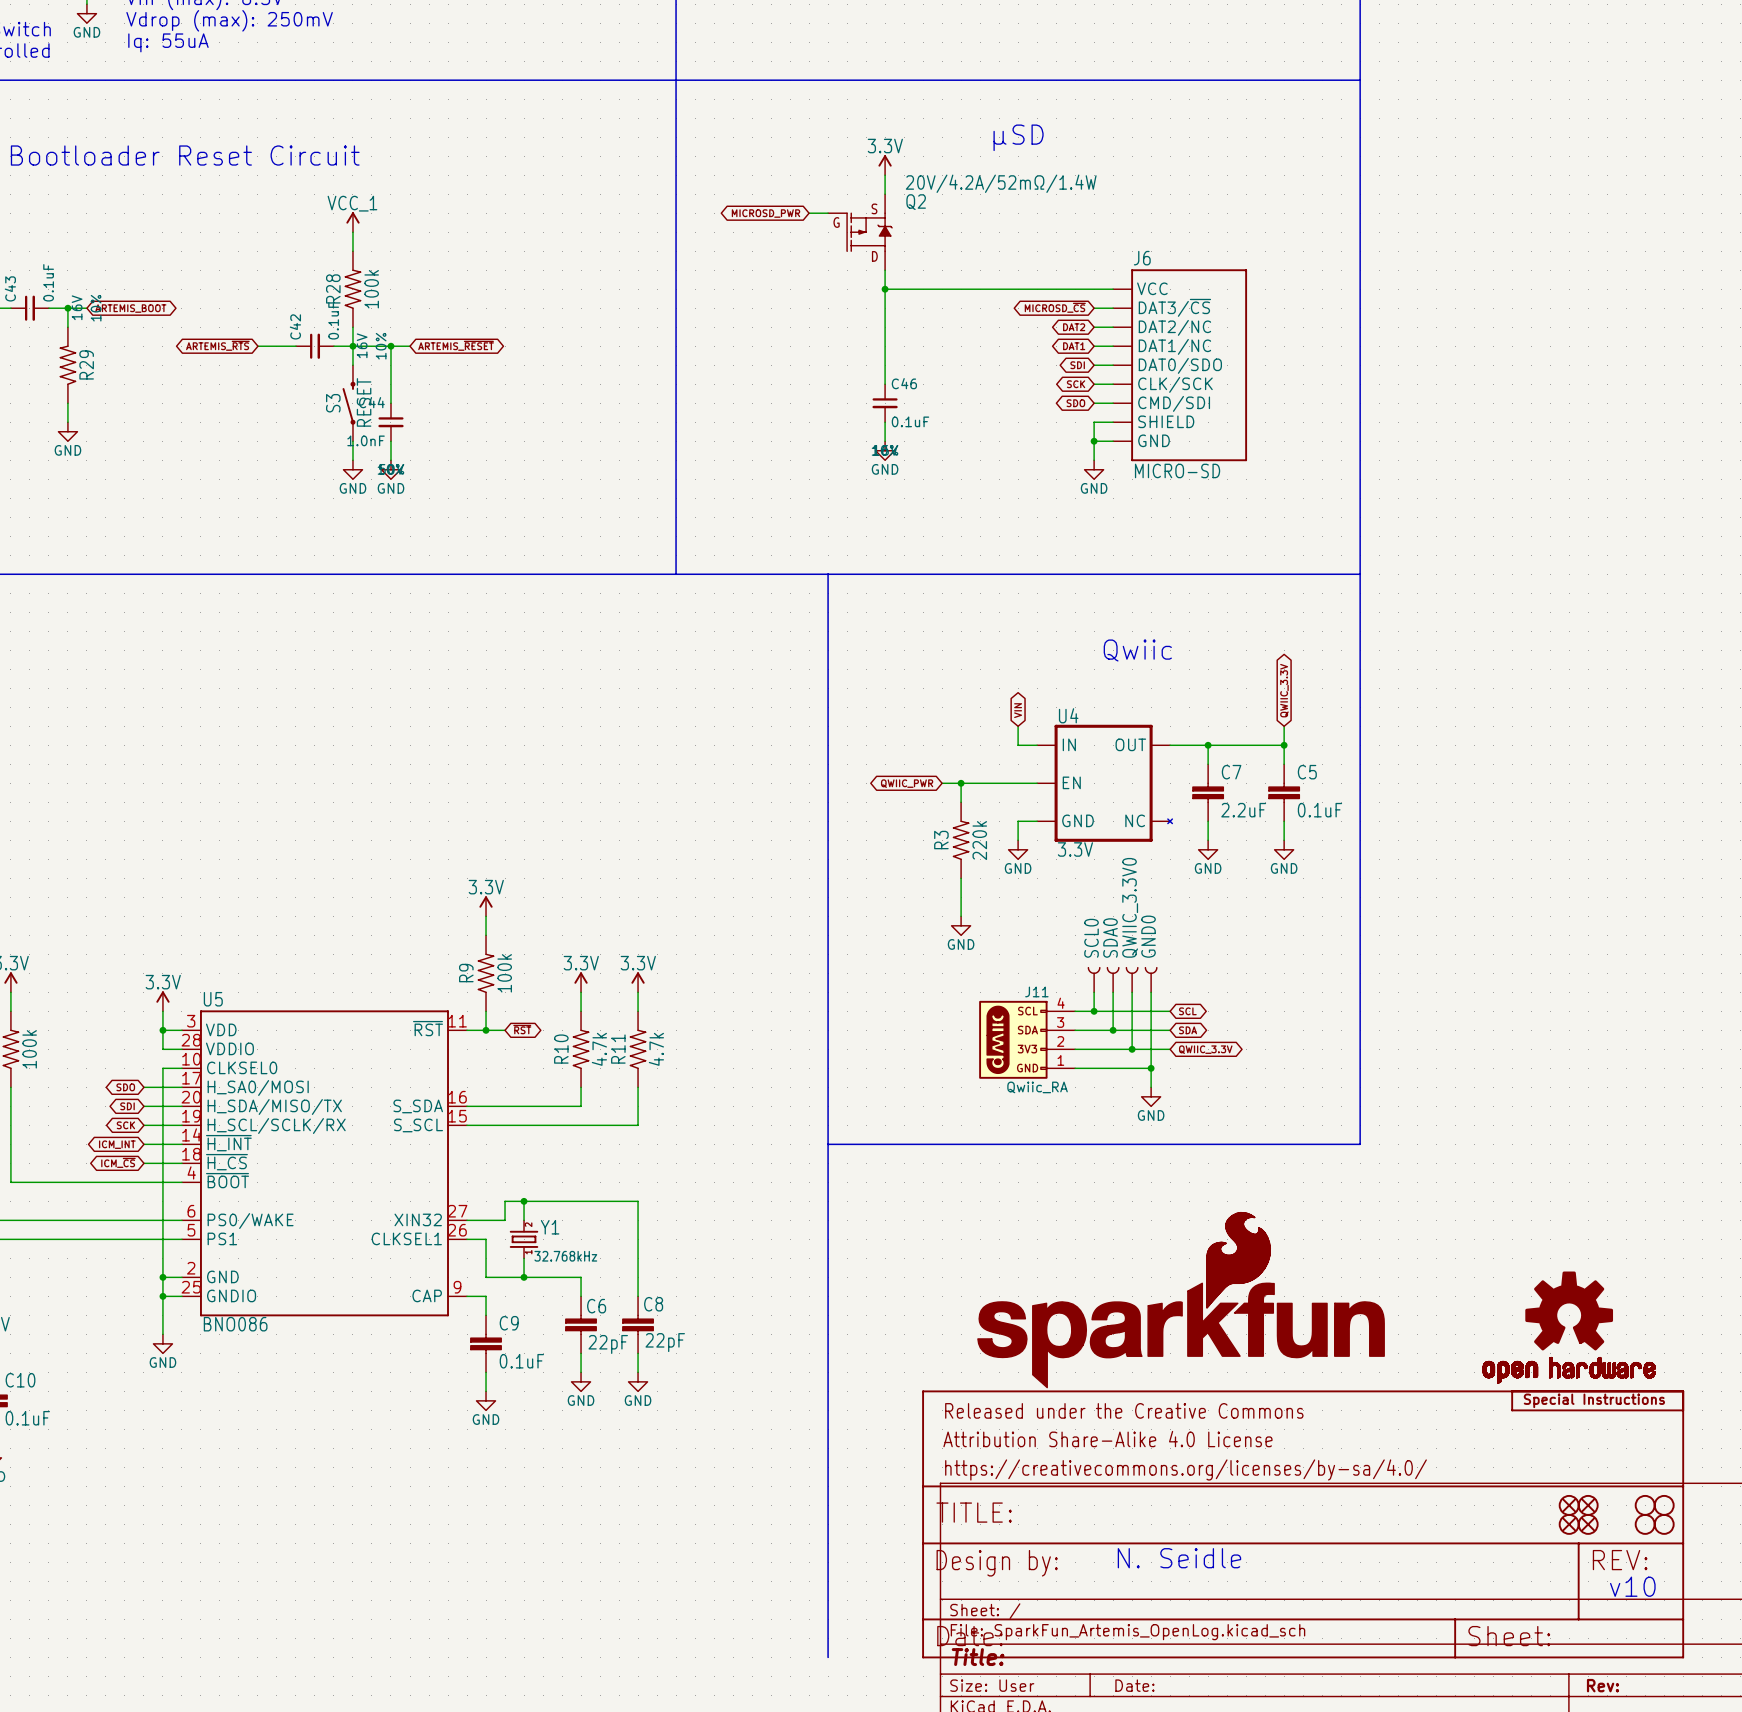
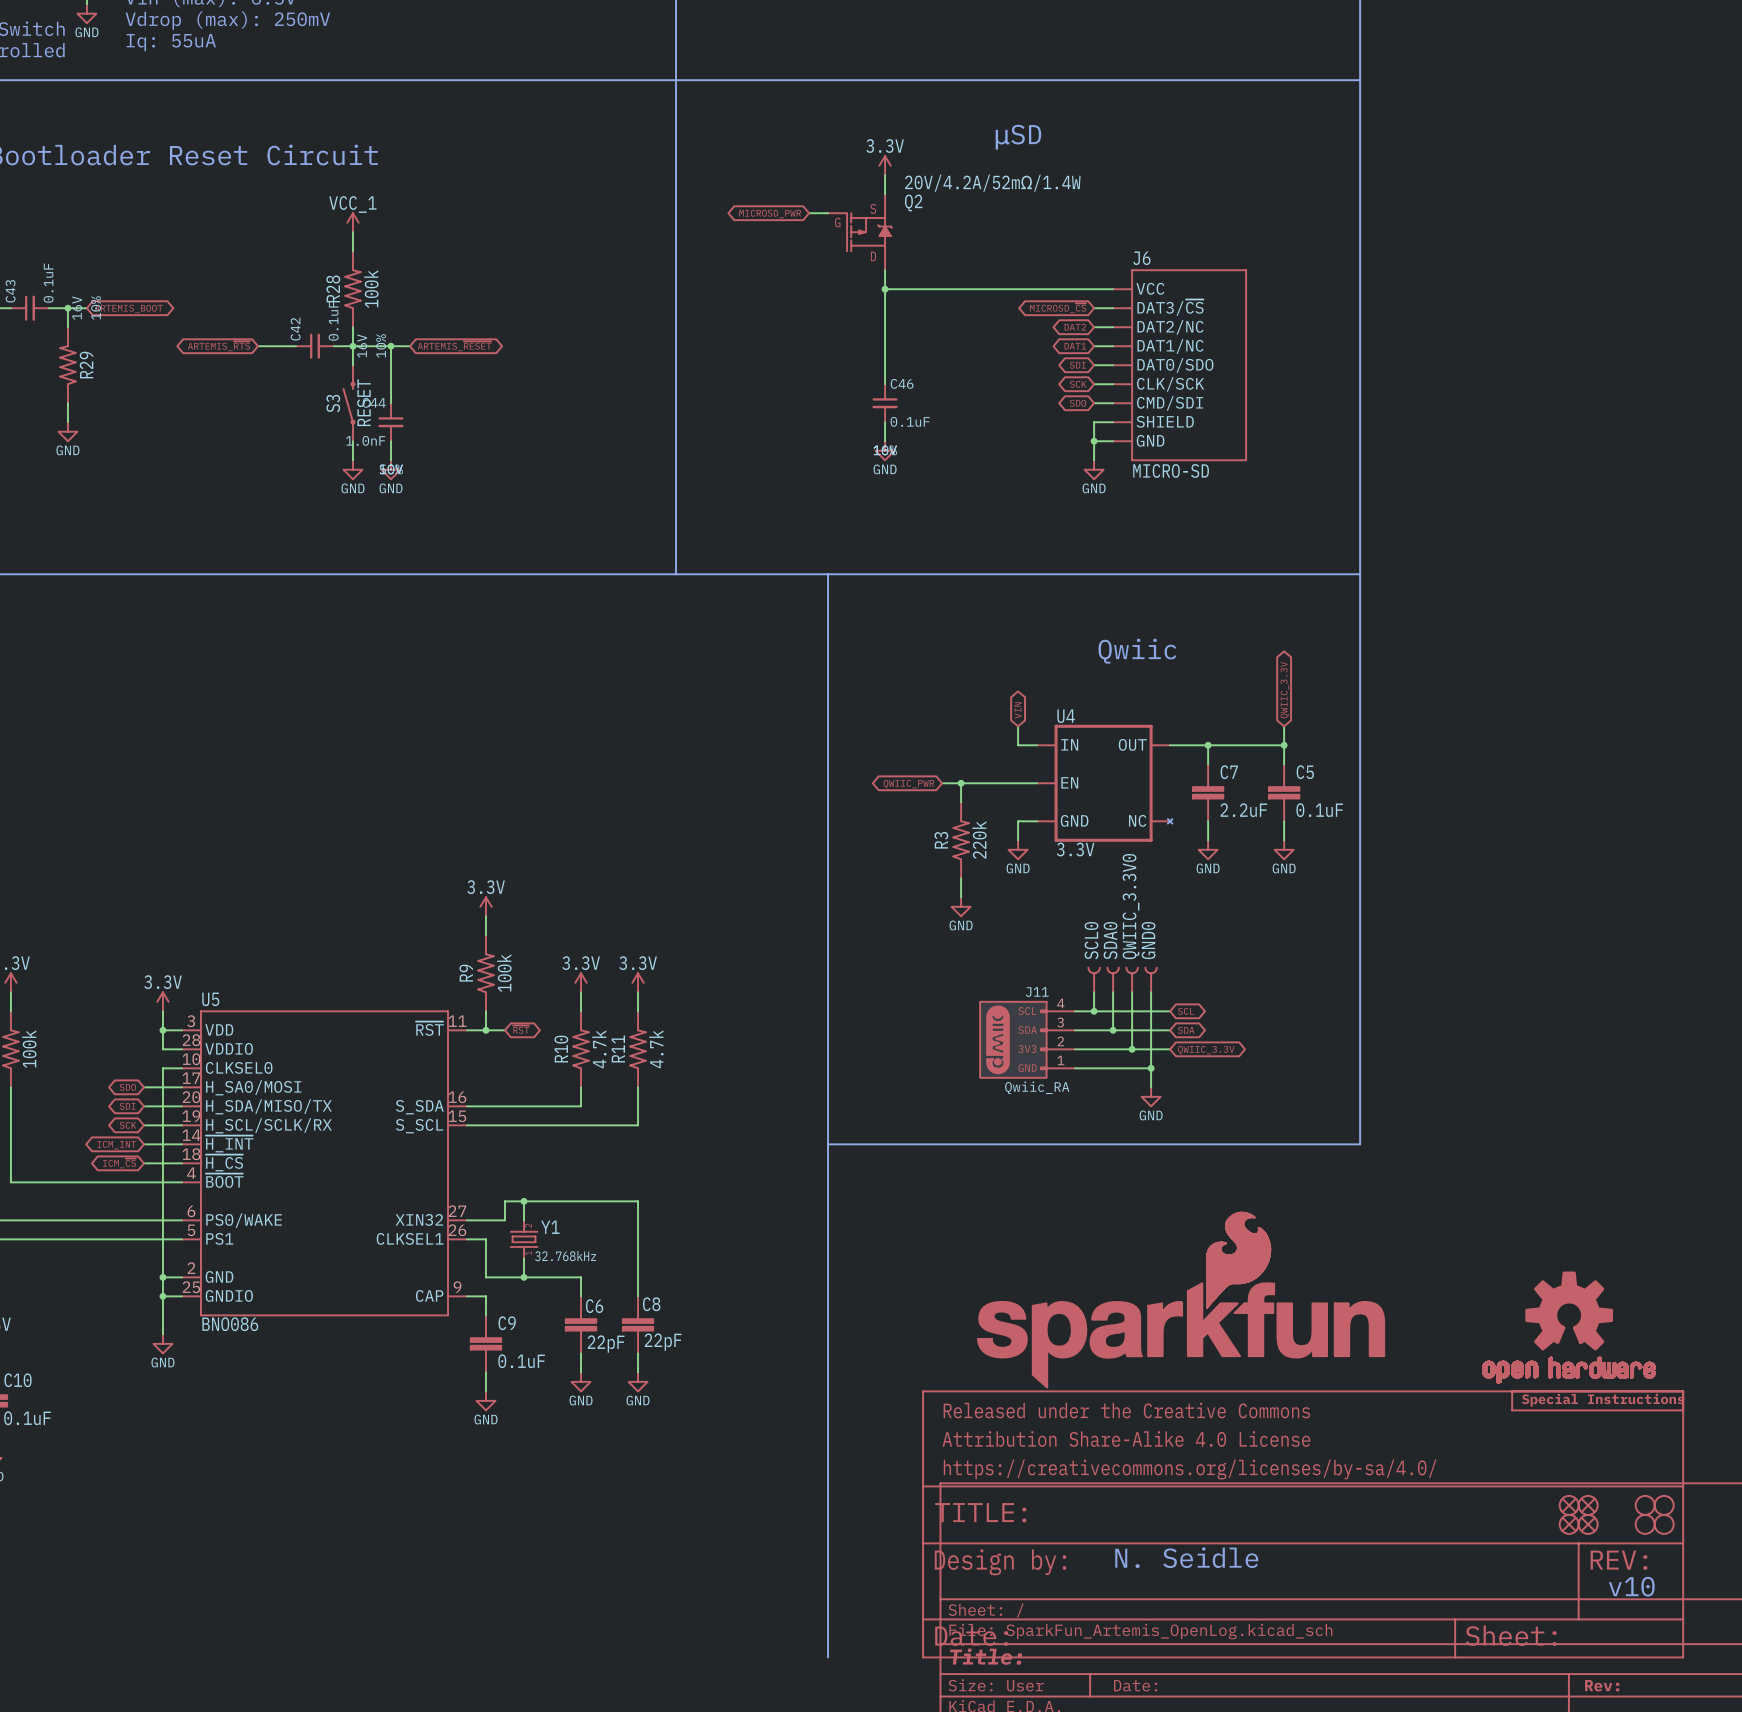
power symbol position: GND (961, 925) -> GND (961, 906)

